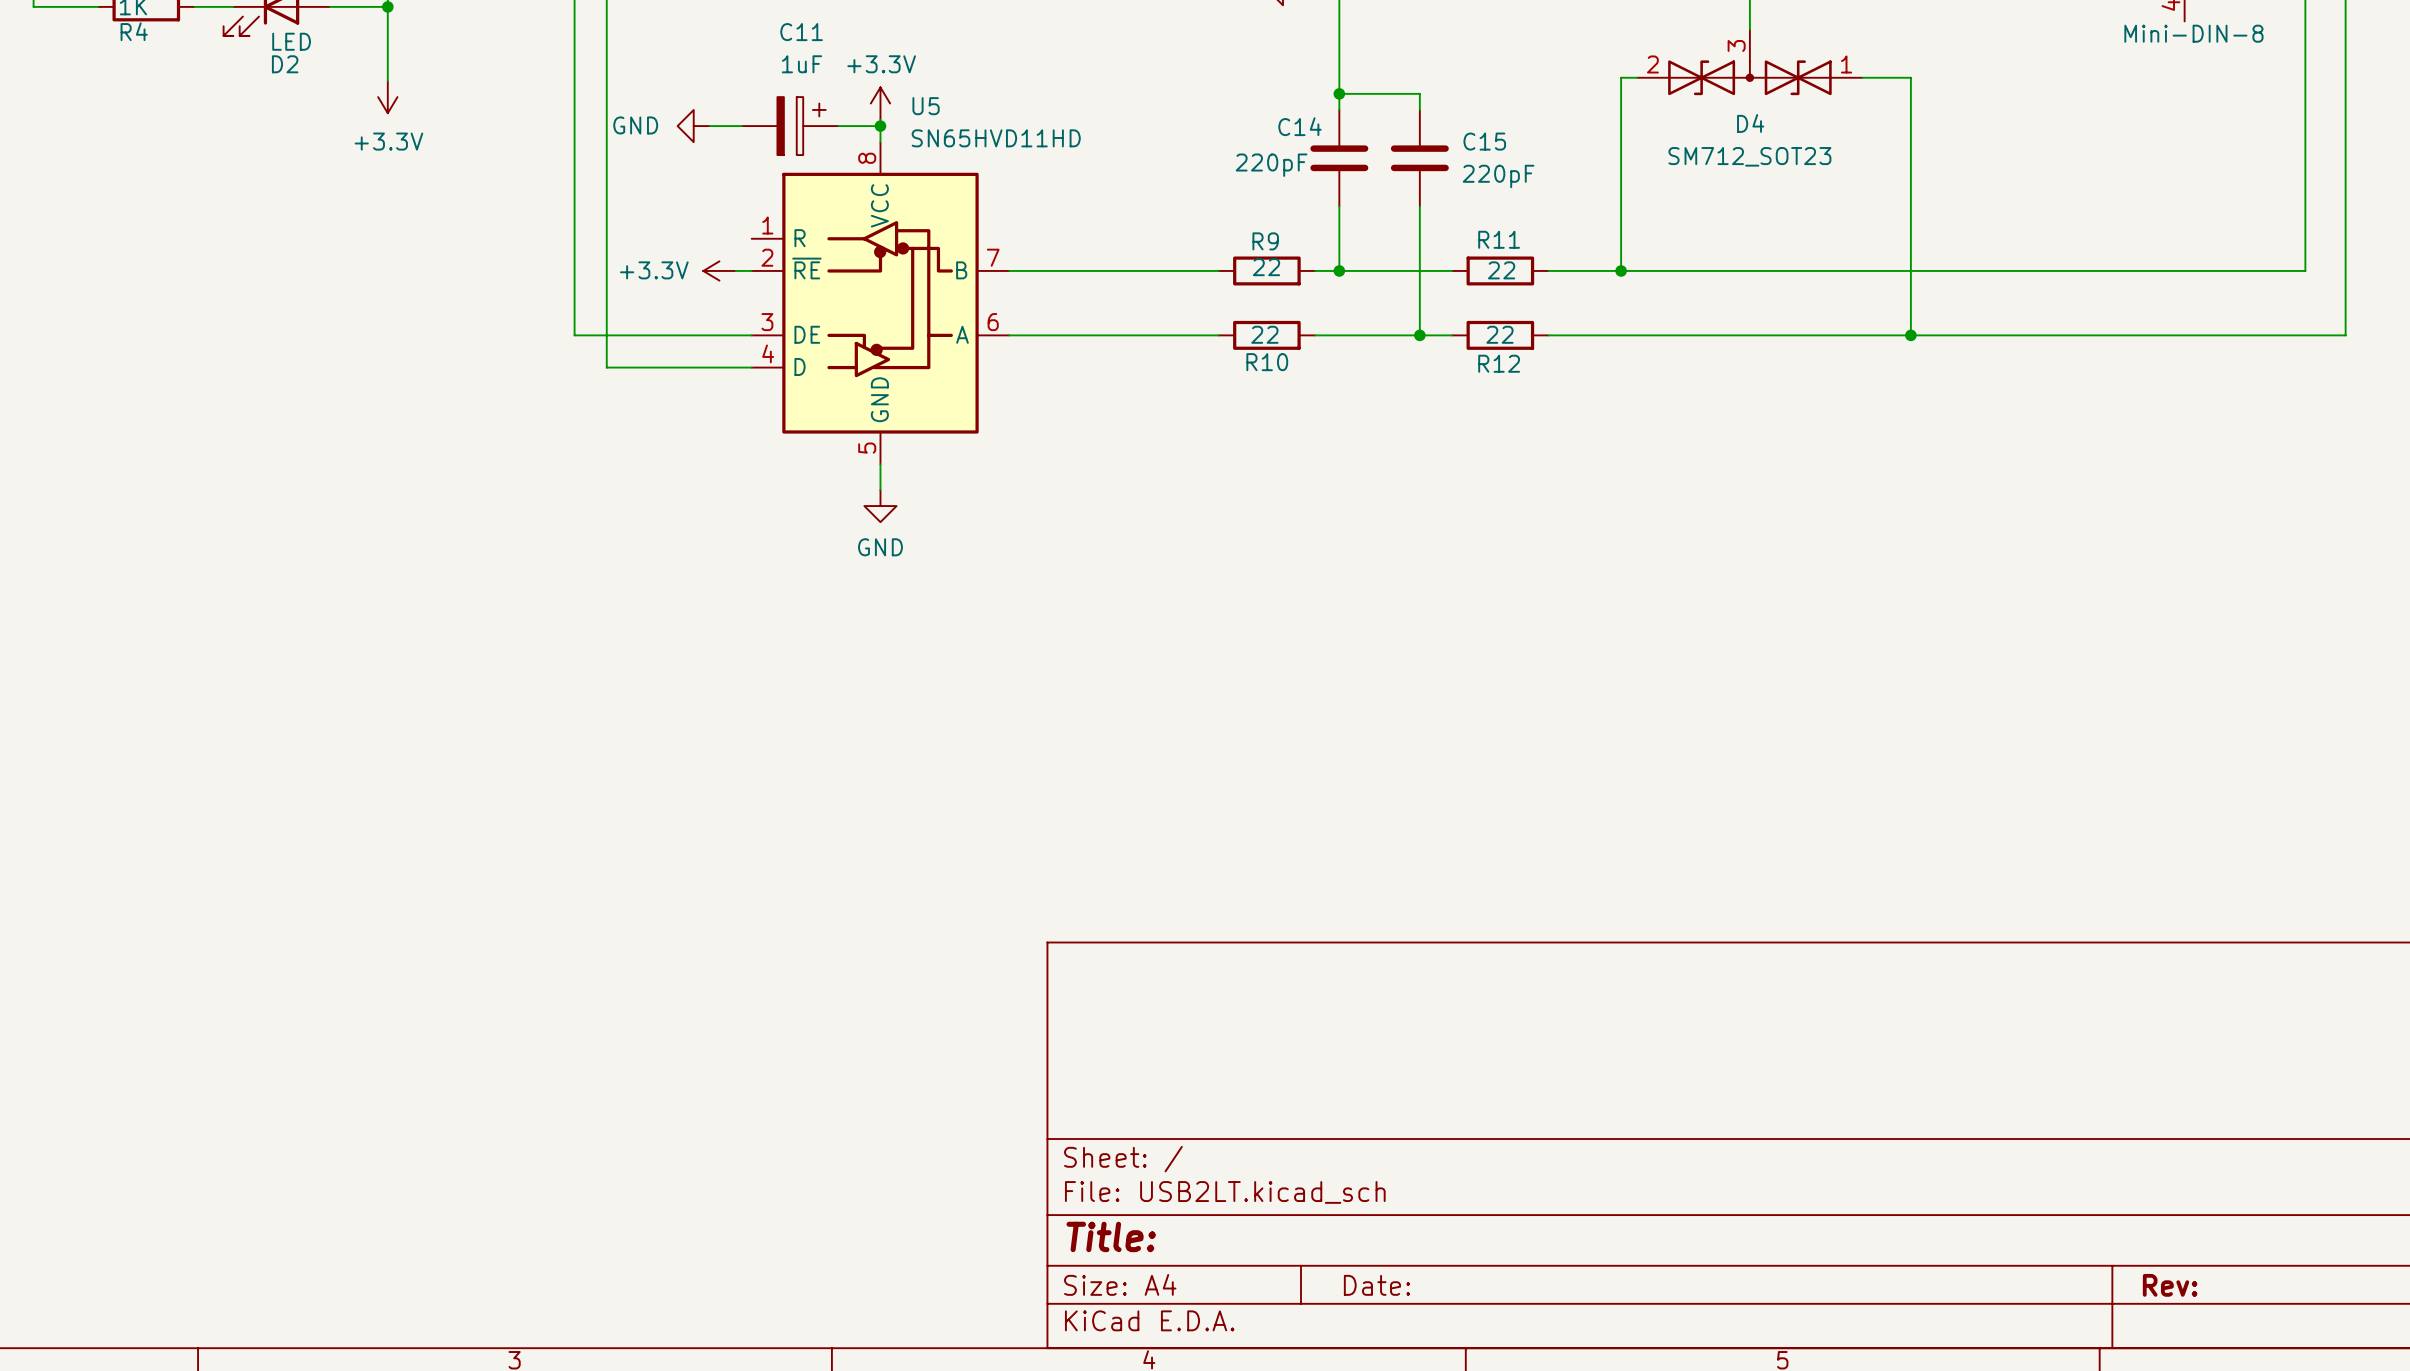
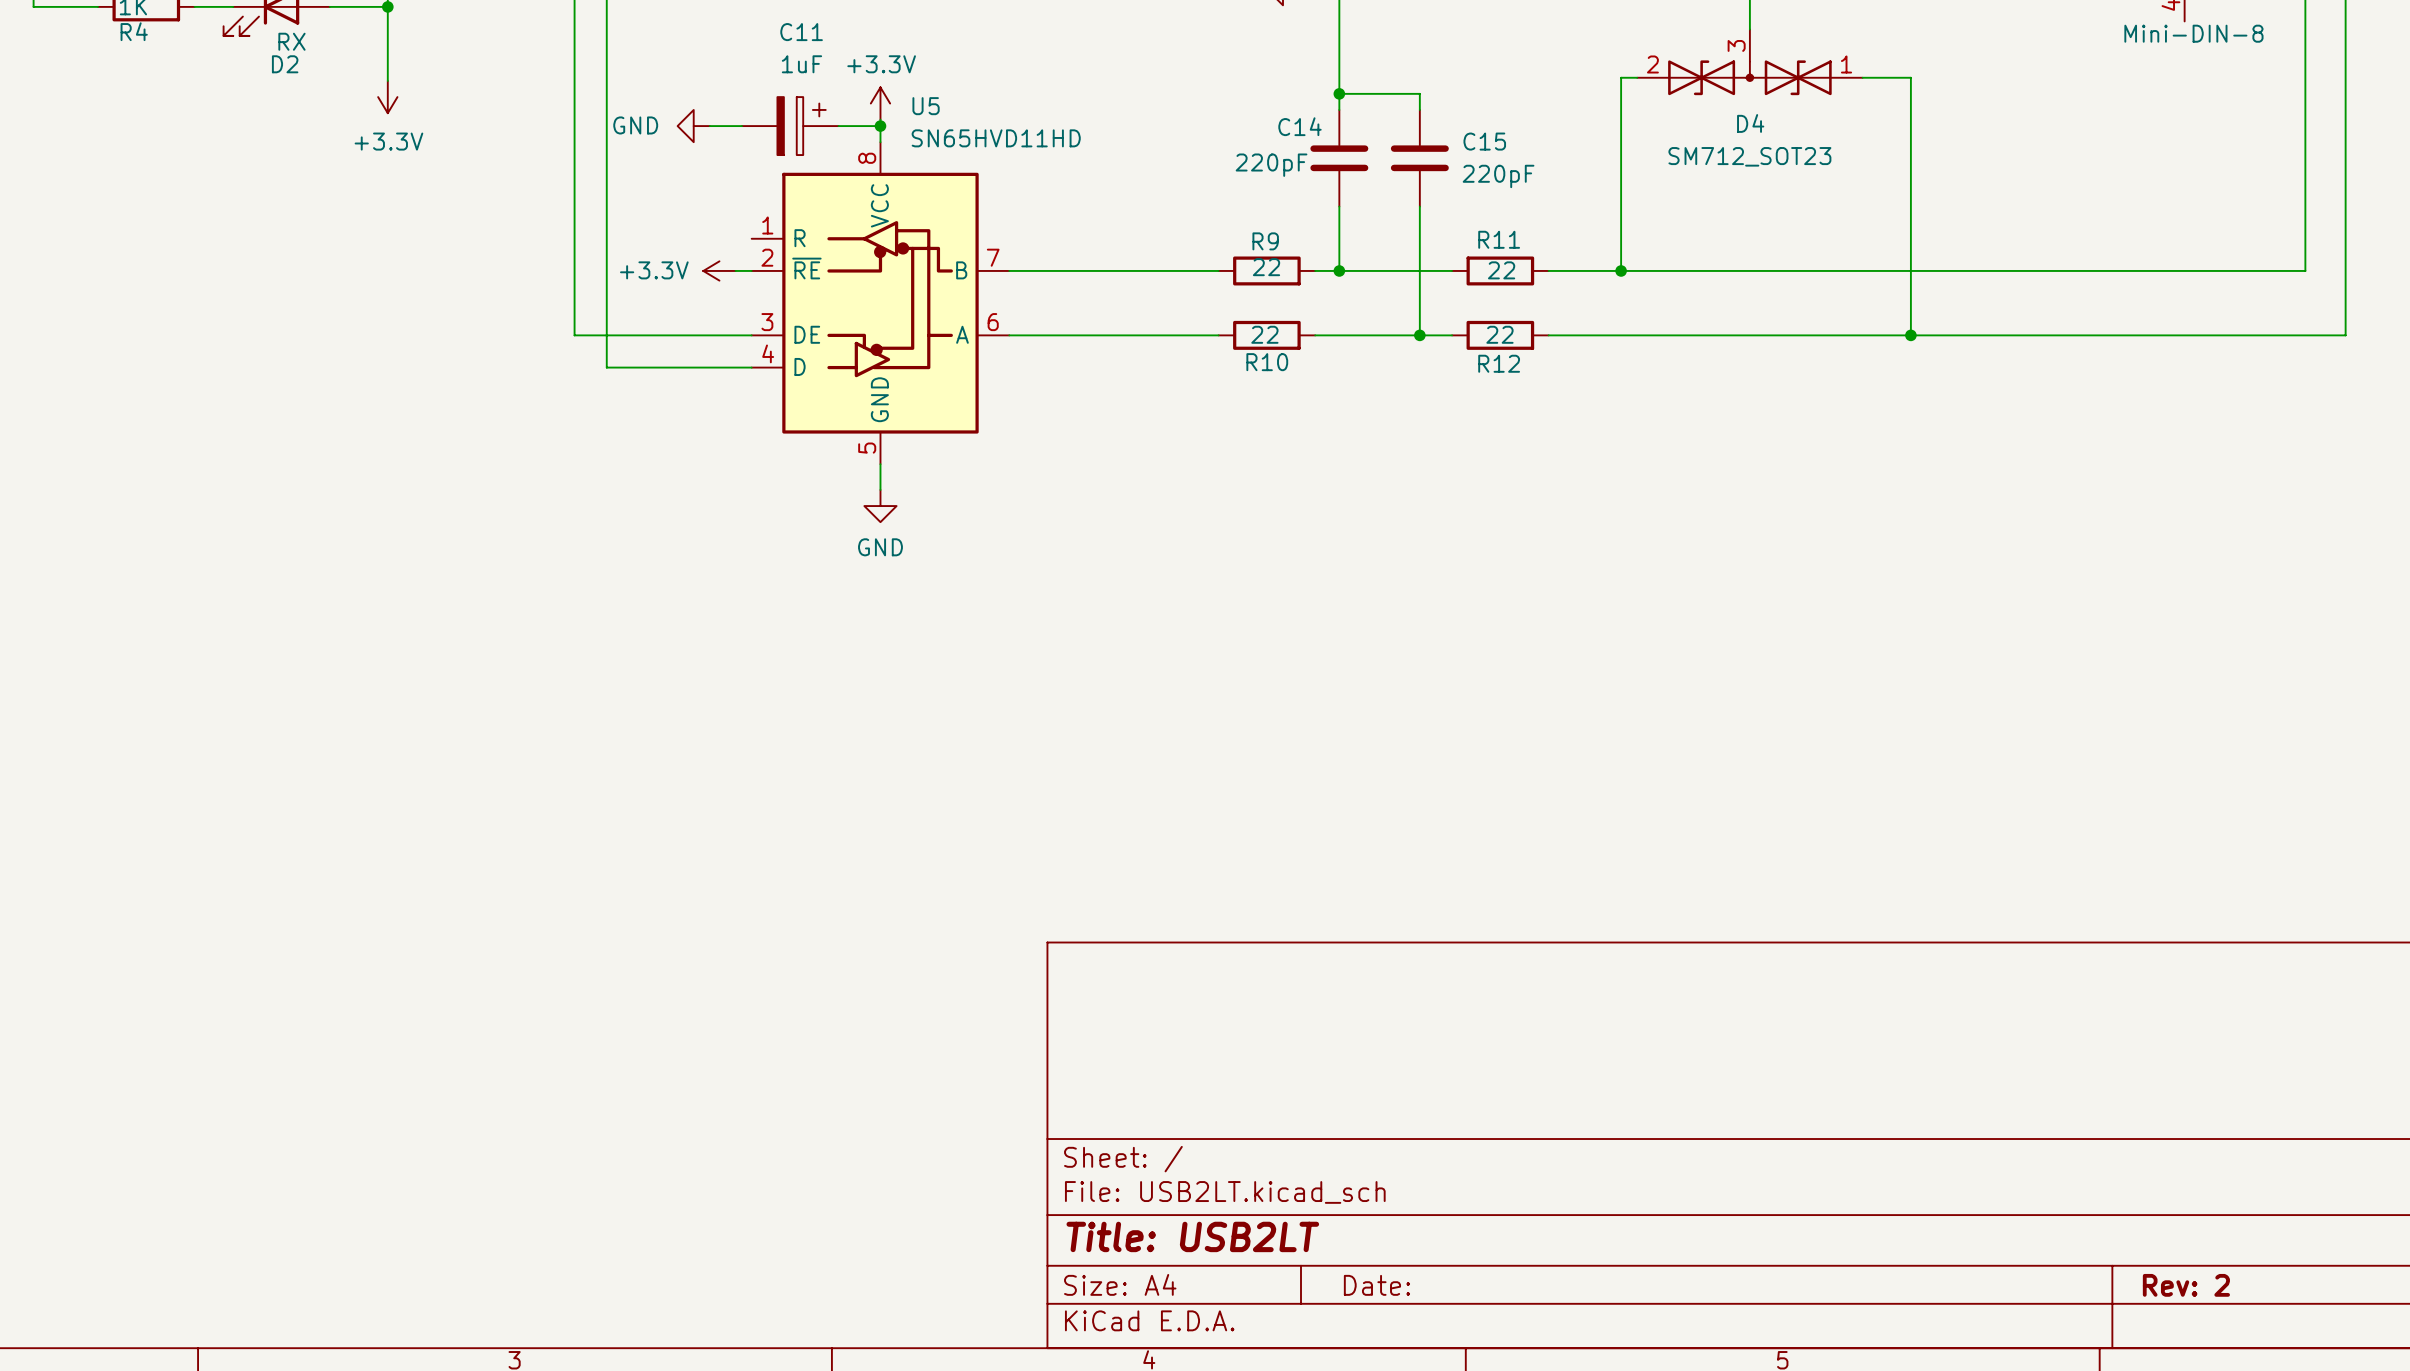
D2 value: LED (291, 41) -> RX (291, 41)
title block: Title: (1111, 1236) -> Title: USB2LT (1192, 1236)
title block: Rev: (2170, 1285) -> Rev: 2 (2186, 1285)

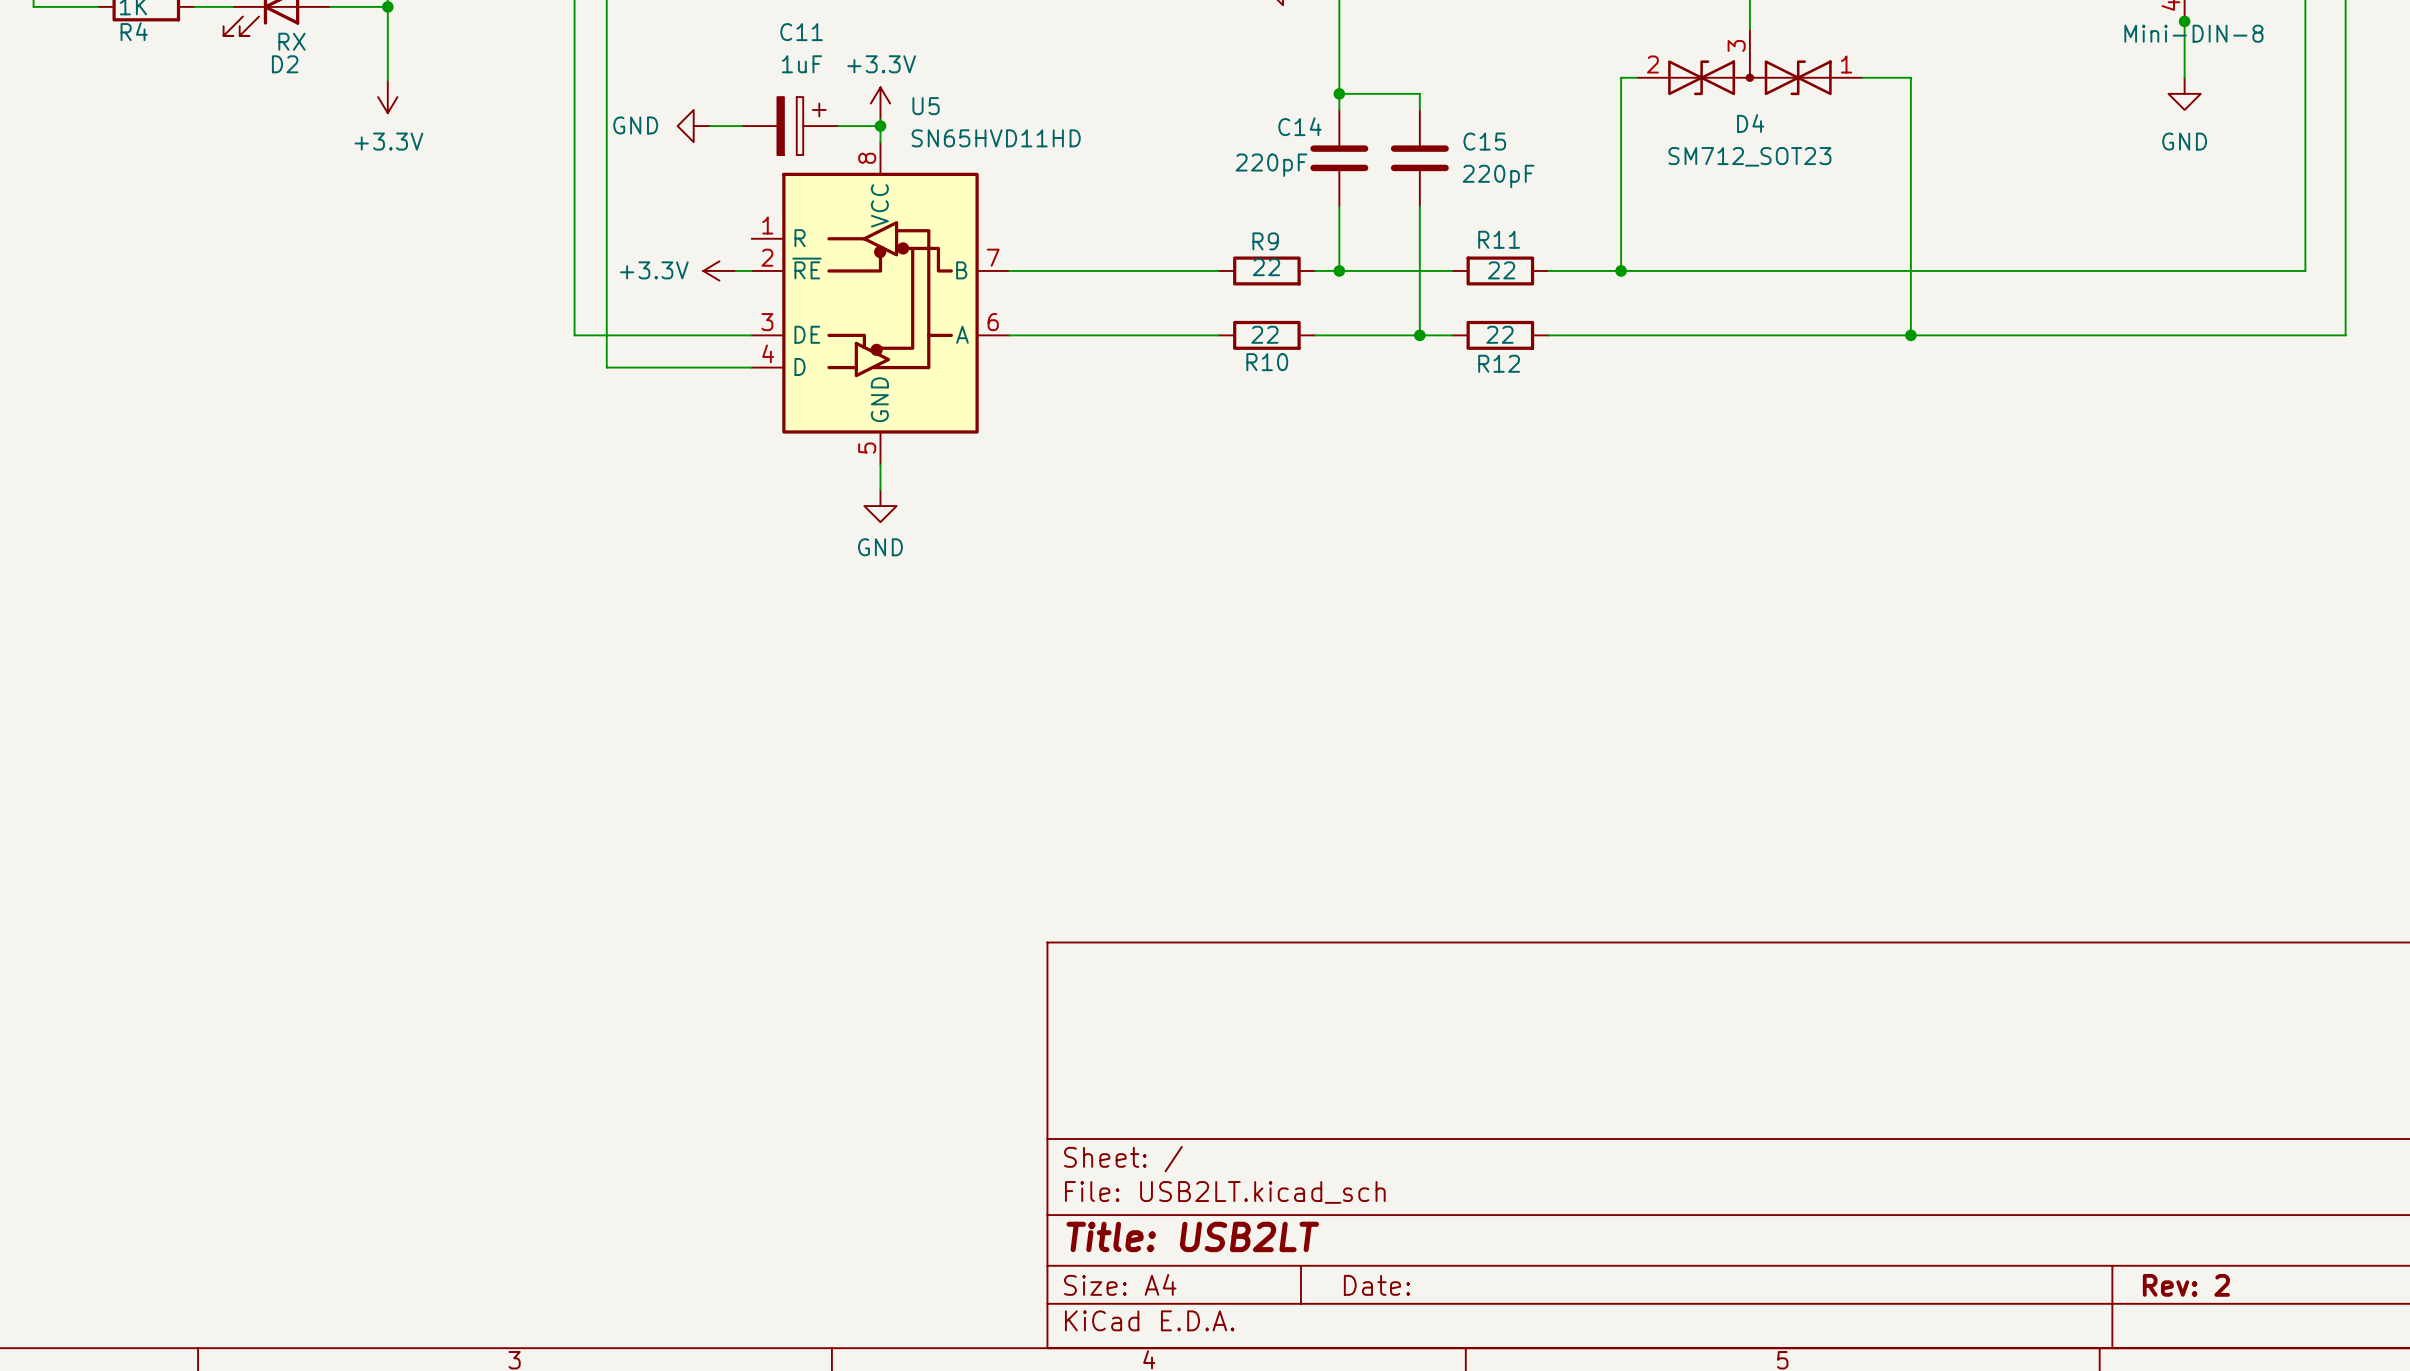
wire: none -> (2184, 19) (2184, 77)
junction: none -> (2184, 21)
power symbol: none -> GND (2184, 93)

